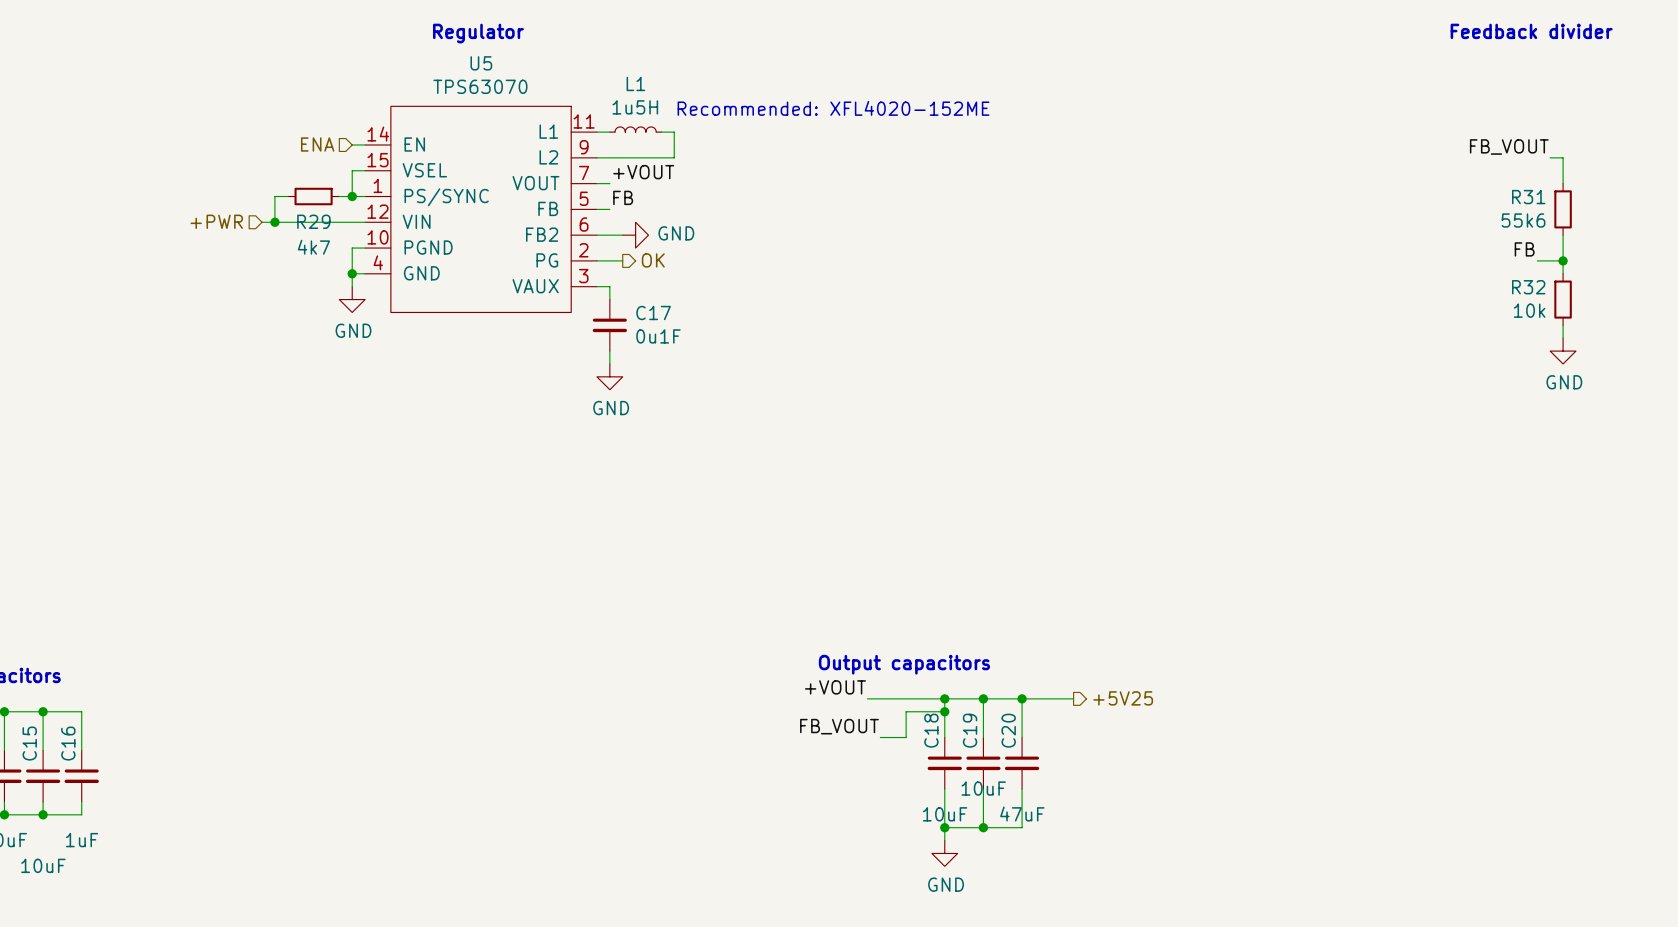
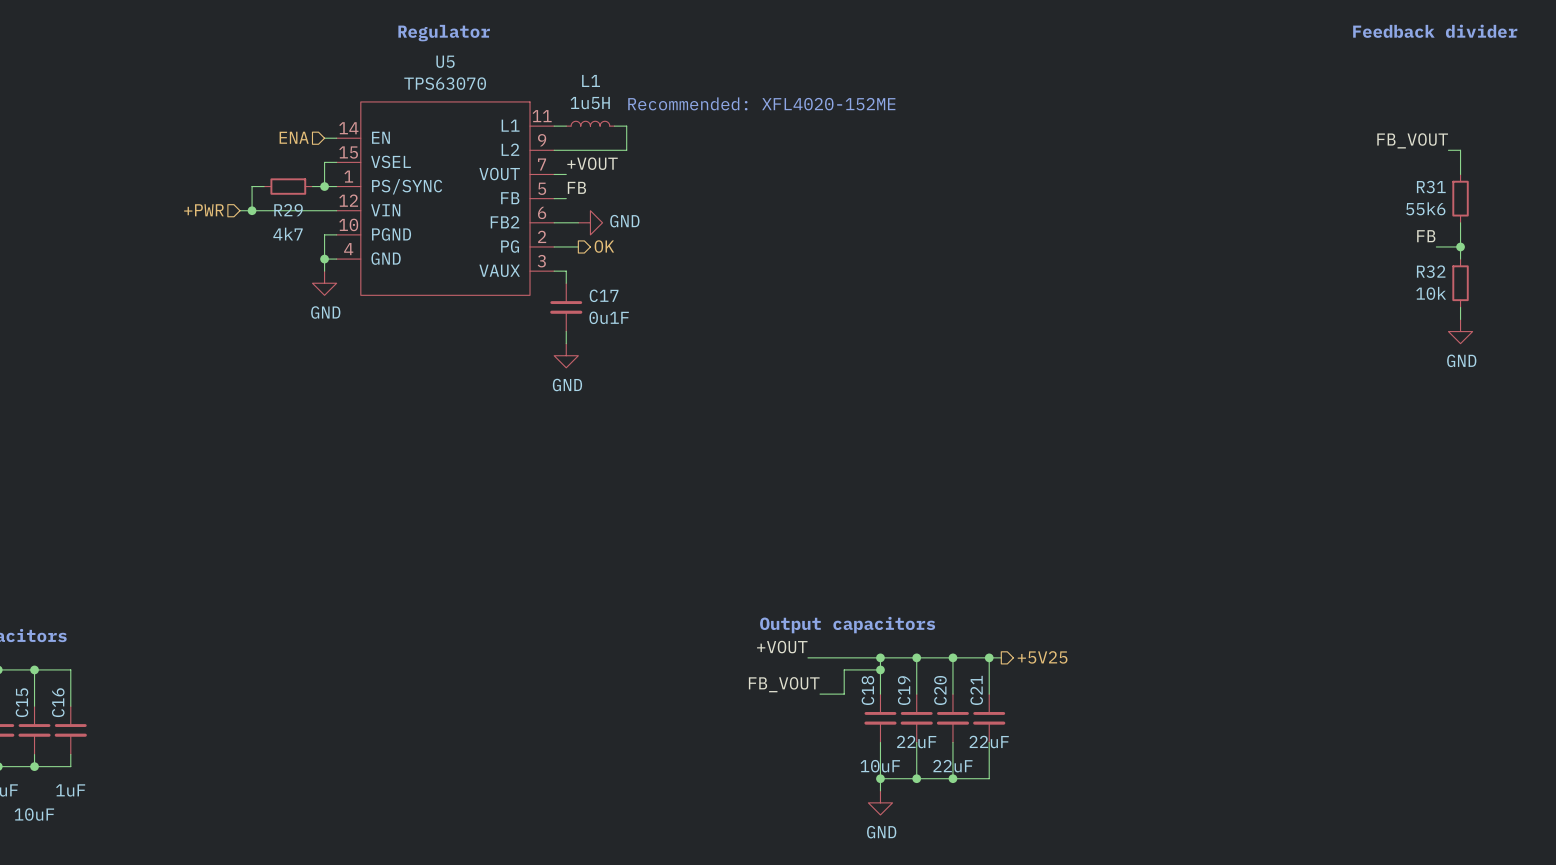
wire: none -> (989, 657) (989, 694)
junction: none -> (989, 657)
C21: none -> 22uF (989, 718)
C19 value: 10uF (983, 788) -> 22uF (916, 742)
wire: none -> (989, 742) (989, 778) (952, 778)
C20 value: 47uF (1022, 814) -> 22uF (952, 766)
junction: none -> (952, 778)

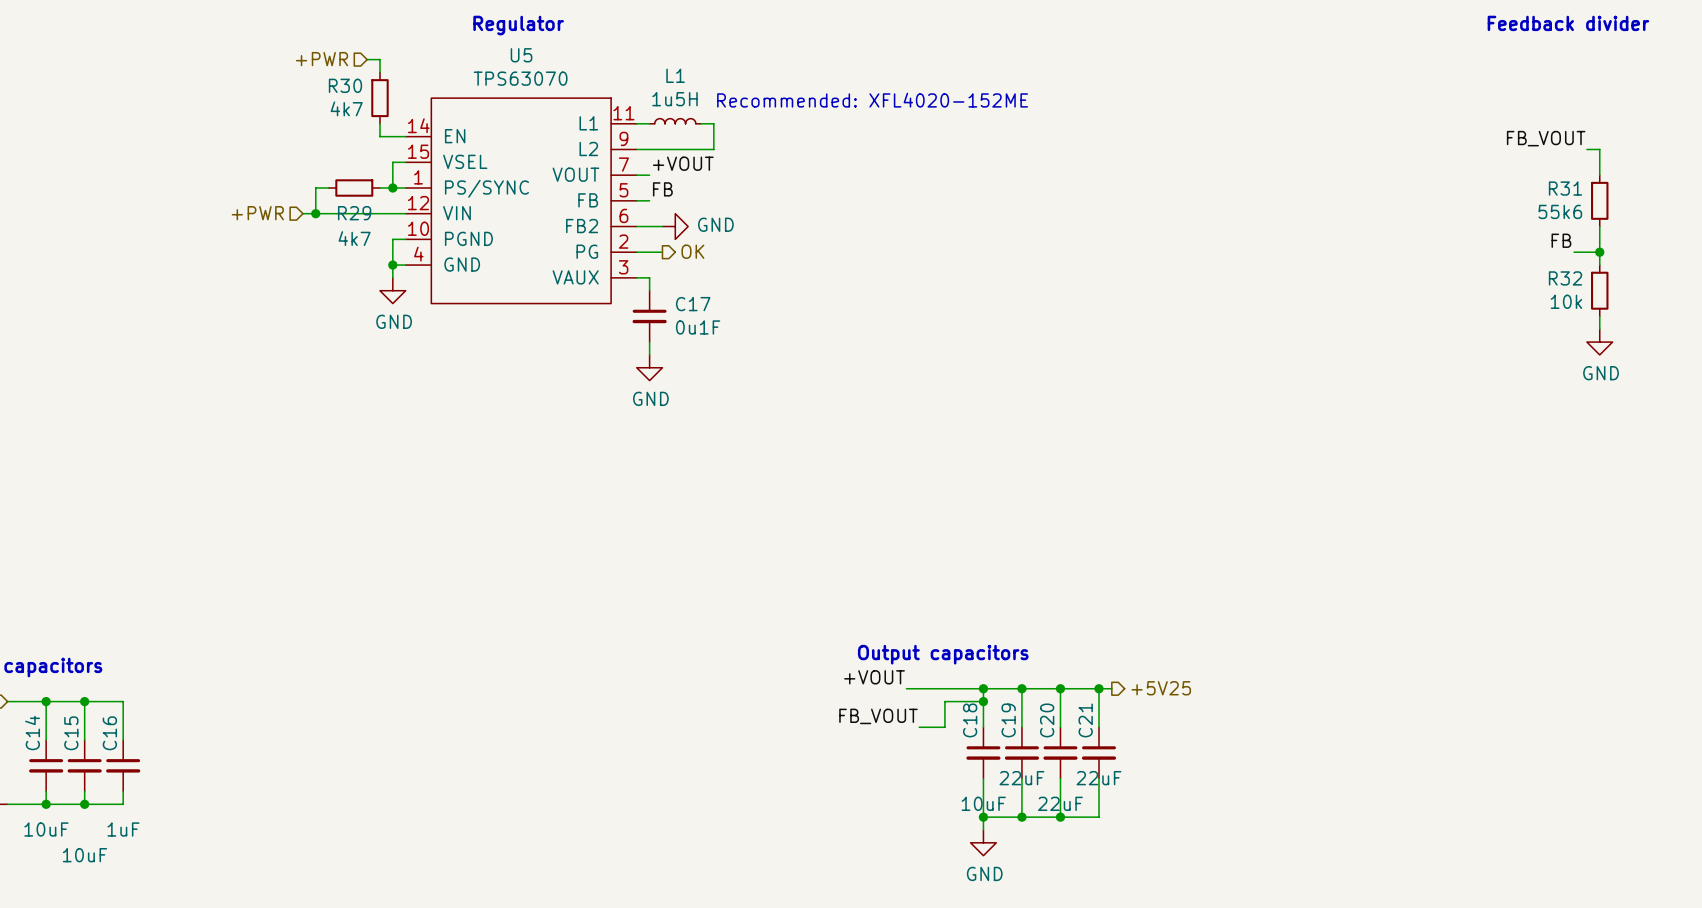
hierarchical label: none -> +PWR (322, 59)
wire: none -> (367, 59) (379, 59) (379, 72)
R30: none -> 4k7 (379, 98)
wire: none -> (379, 123) (379, 136) (392, 136)
hierarchical label: ENA (294, 137) -> none

